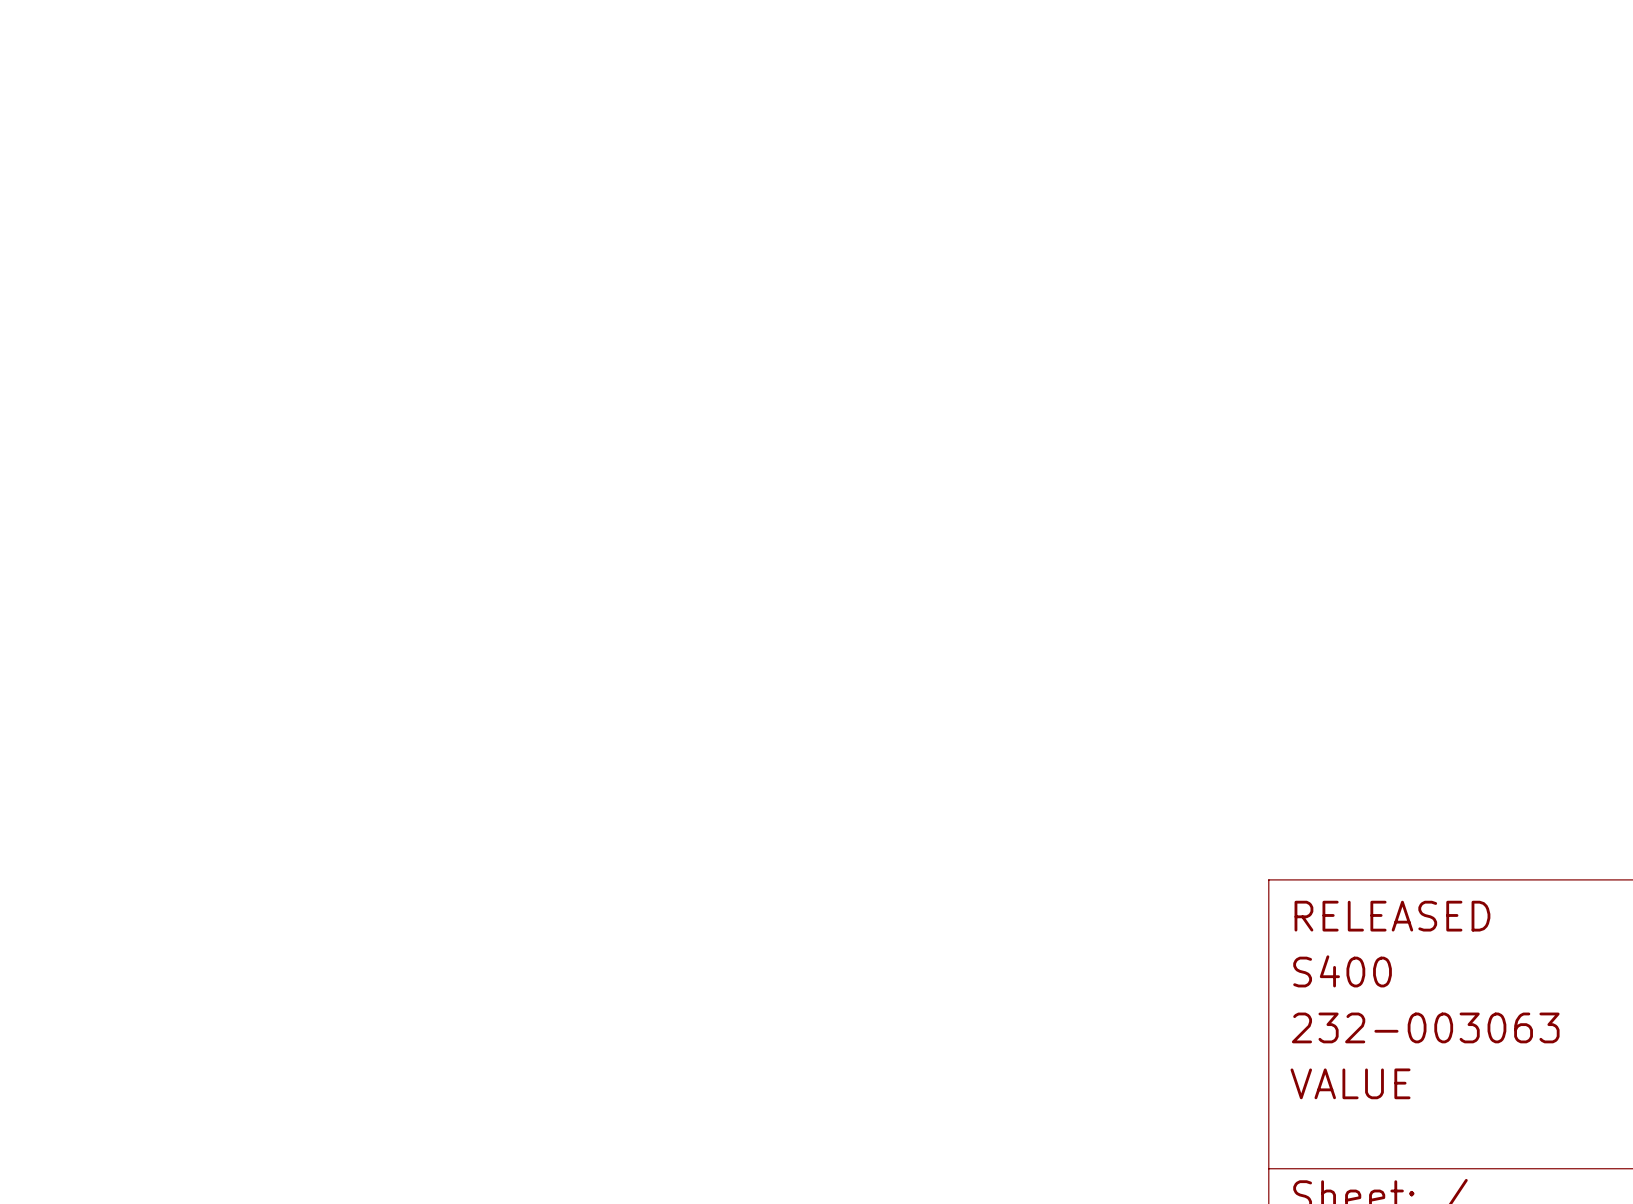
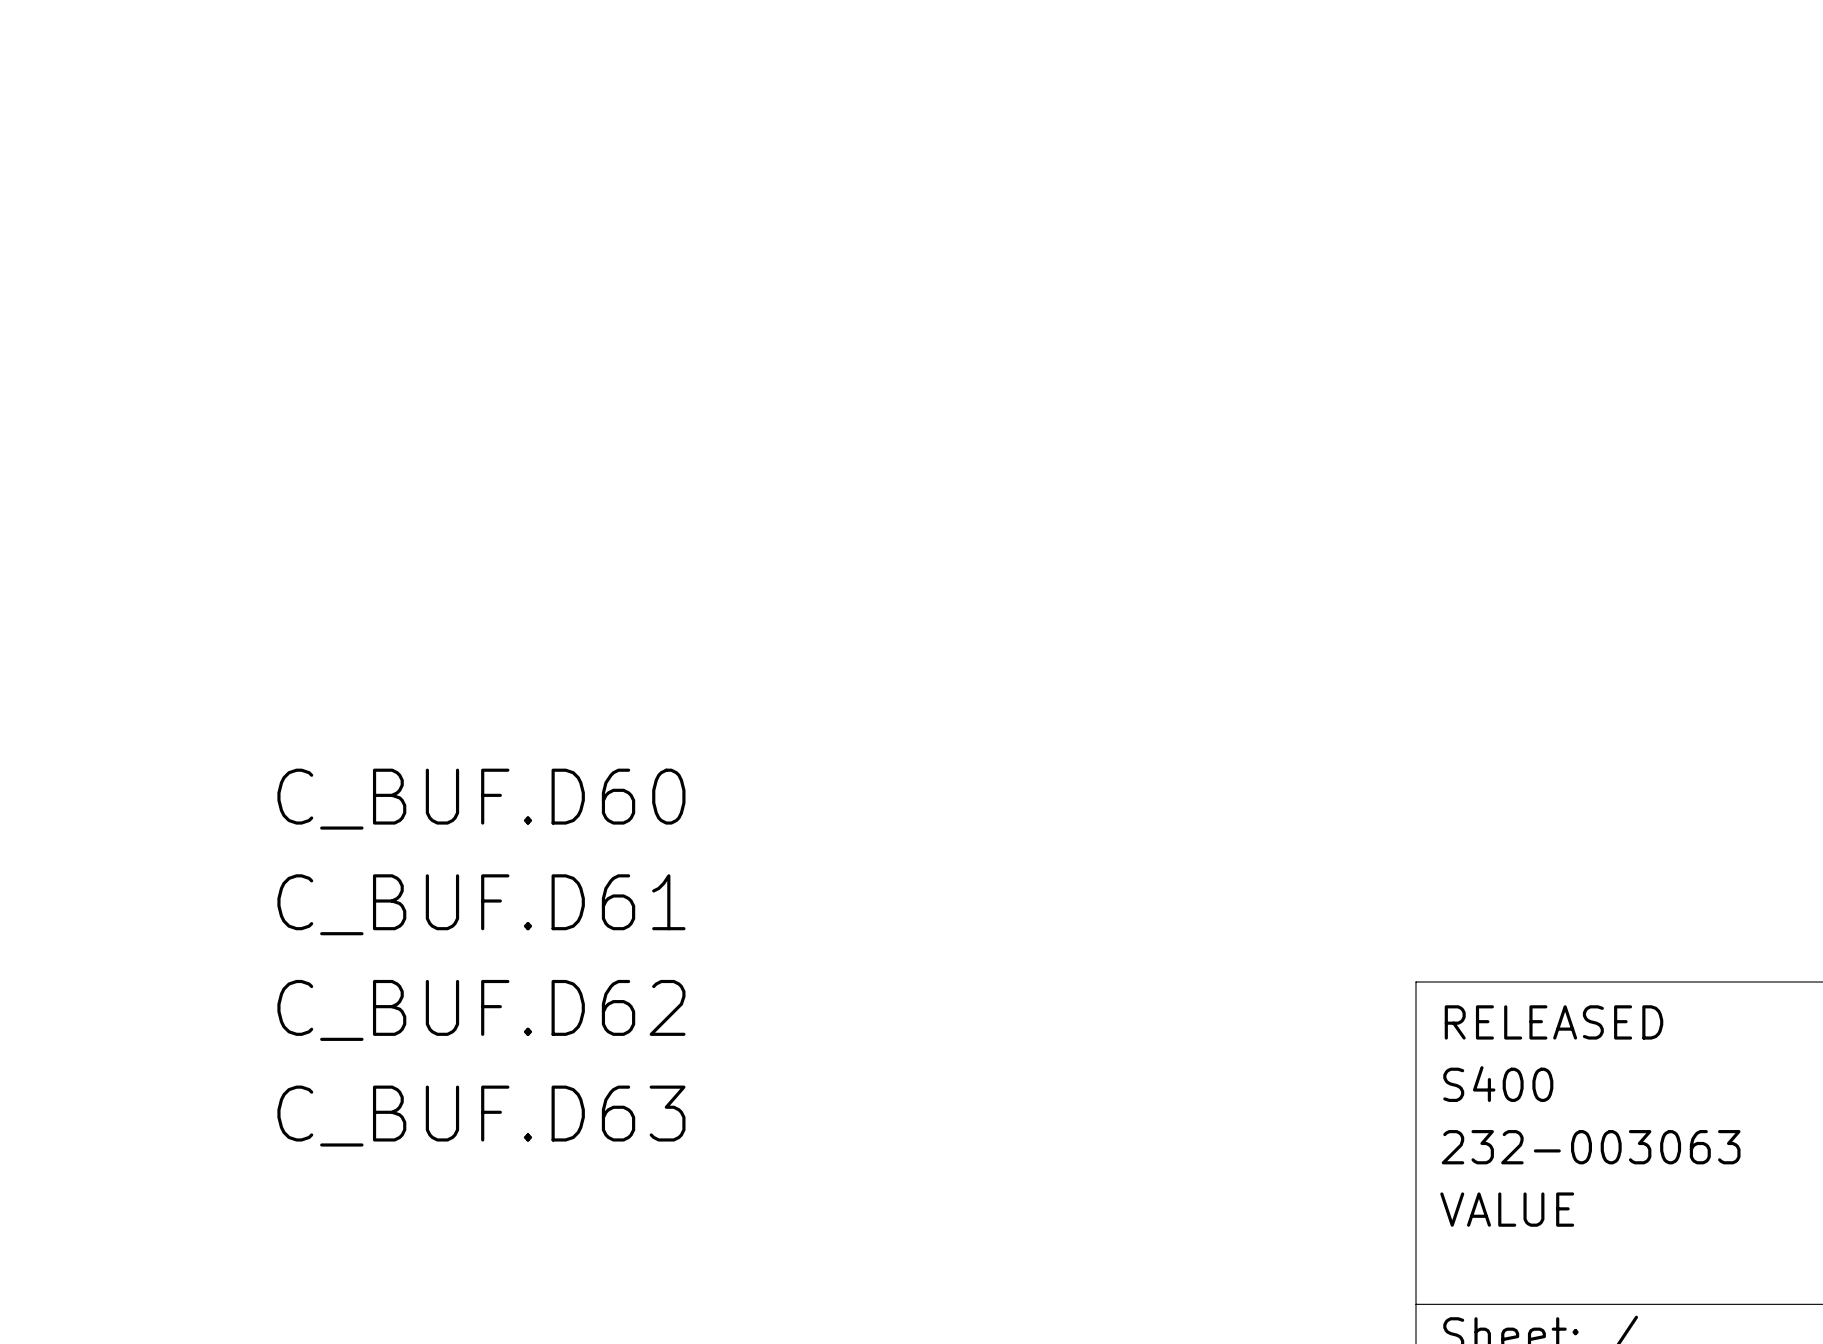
label: none -> C_BUF.D60 (481, 799)
label: none -> C_BUF.D61 (481, 904)
label: none -> C_BUF.D62 (481, 1010)
label: none -> C_BUF.D63 (481, 1116)

